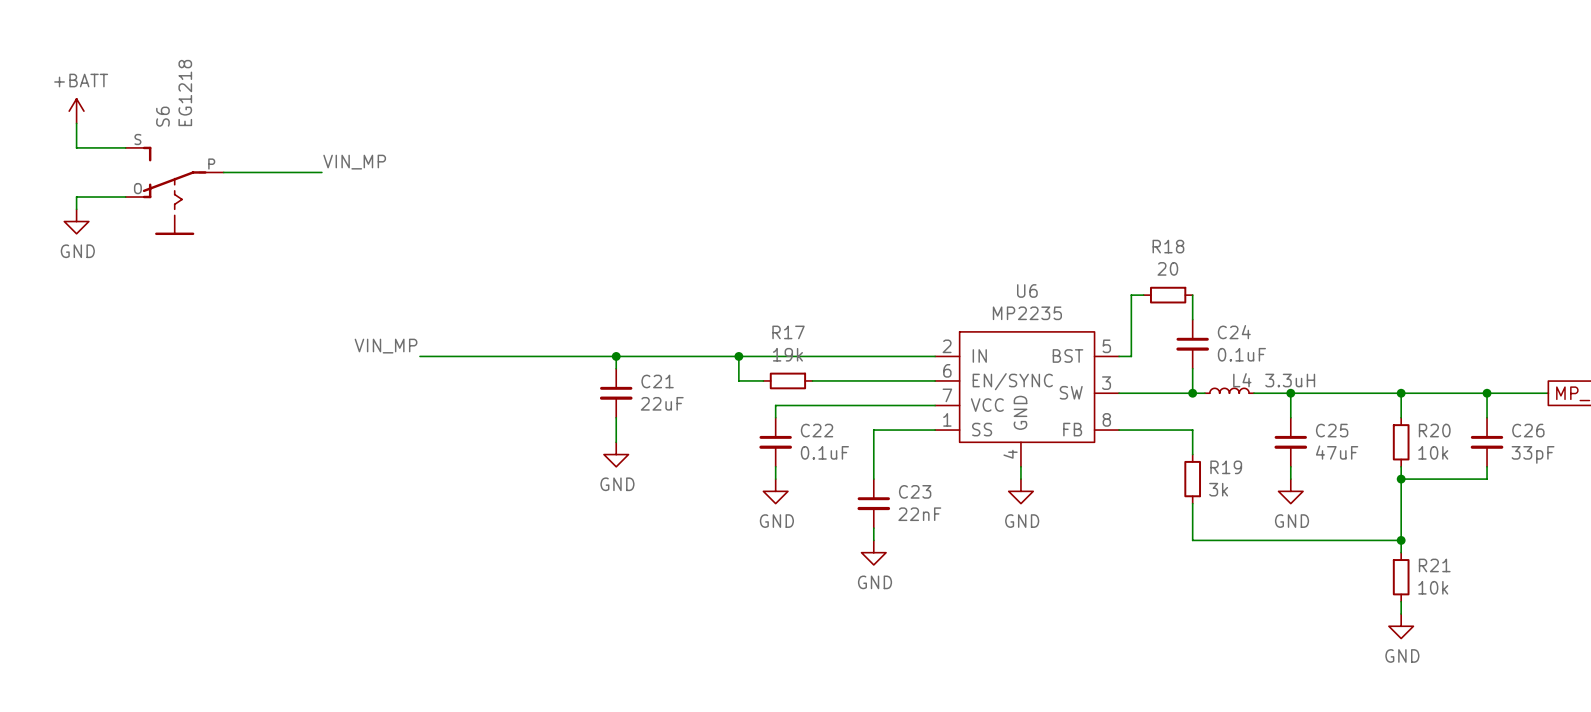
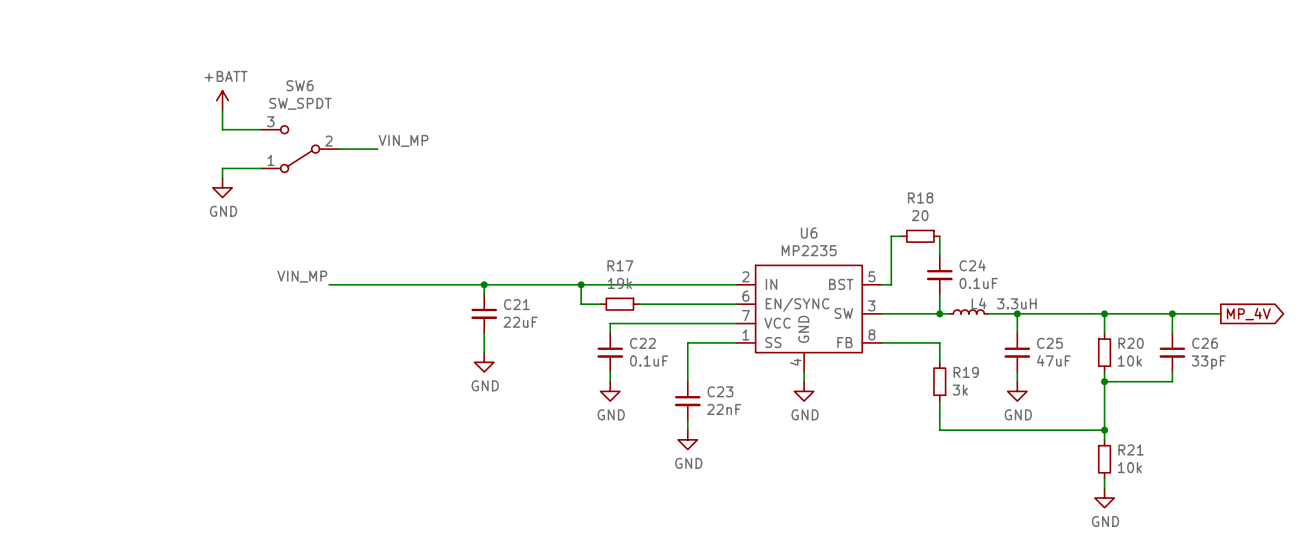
power symbol position: +BATT (76, 111) -> +BATT (222, 100)
wire: (76, 123) (76, 147) (125, 147) -> (222, 110) (222, 129) (261, 129)
label position: VIN_MP (354, 162) -> VIN_MP (403, 140)
wire: (223, 172) (321, 172) -> none
SW6: none -> SW_SPDT (300, 149)
wire: none -> (338, 149) (377, 149)
S6: EG1218 (174, 190) -> none
wire: (125, 197) (76, 197) (76, 209) -> (261, 168) (222, 168) (222, 178)
power symbol position: GND (76, 221) -> GND (222, 187)

